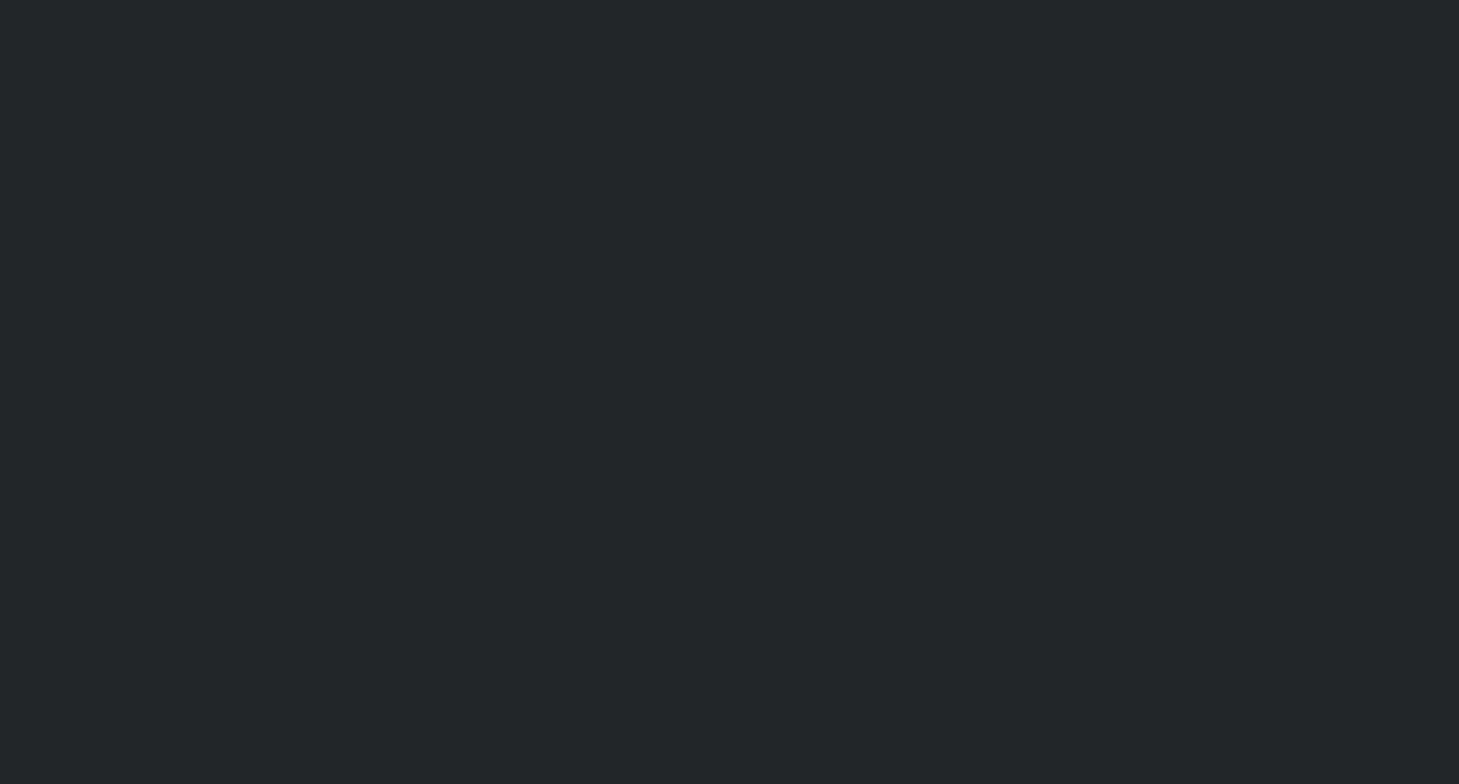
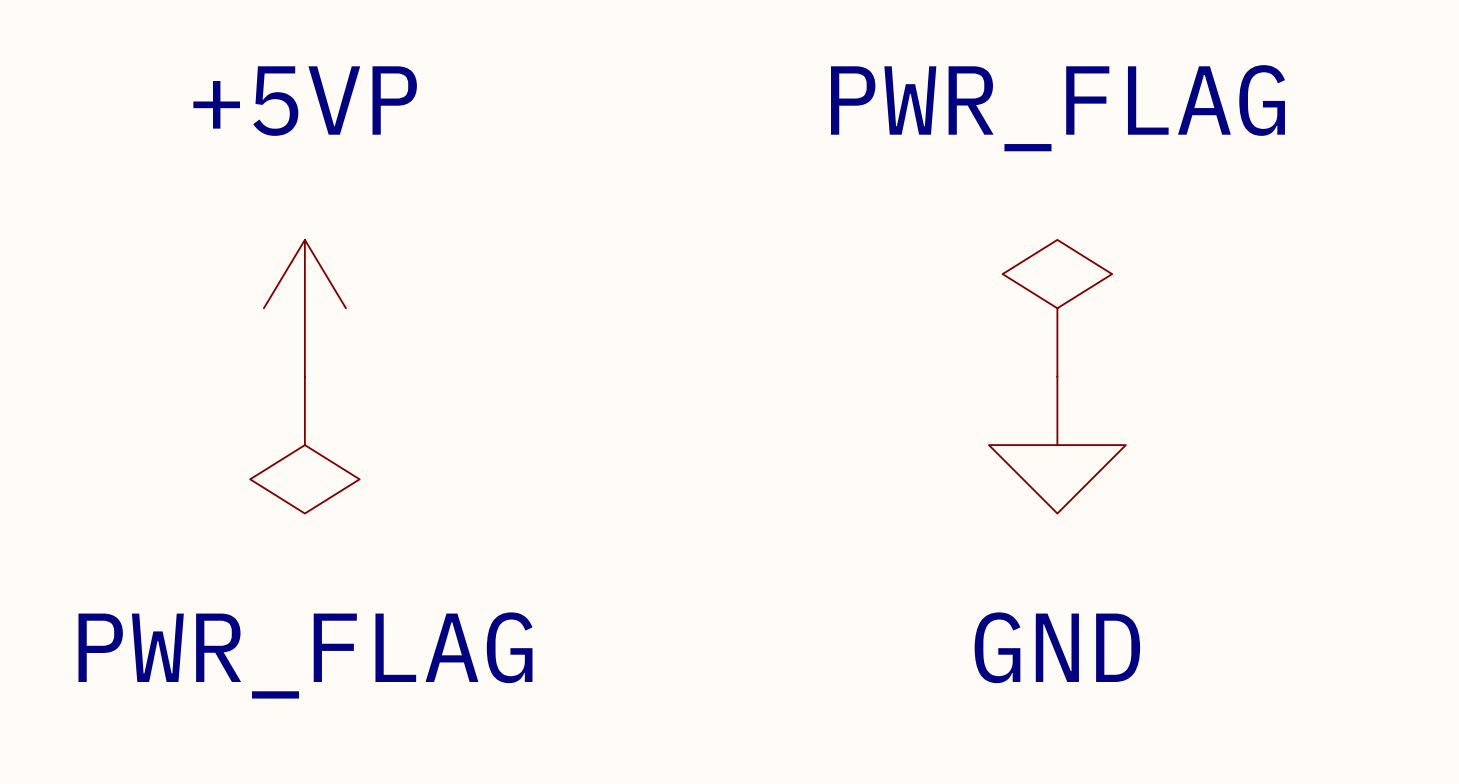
power symbol: none -> +5VP (304, 308)
power symbol: none -> PWR_FLAG (1057, 308)
power symbol: none -> PWR_FLAG (304, 445)
power symbol: none -> GND (1057, 445)

